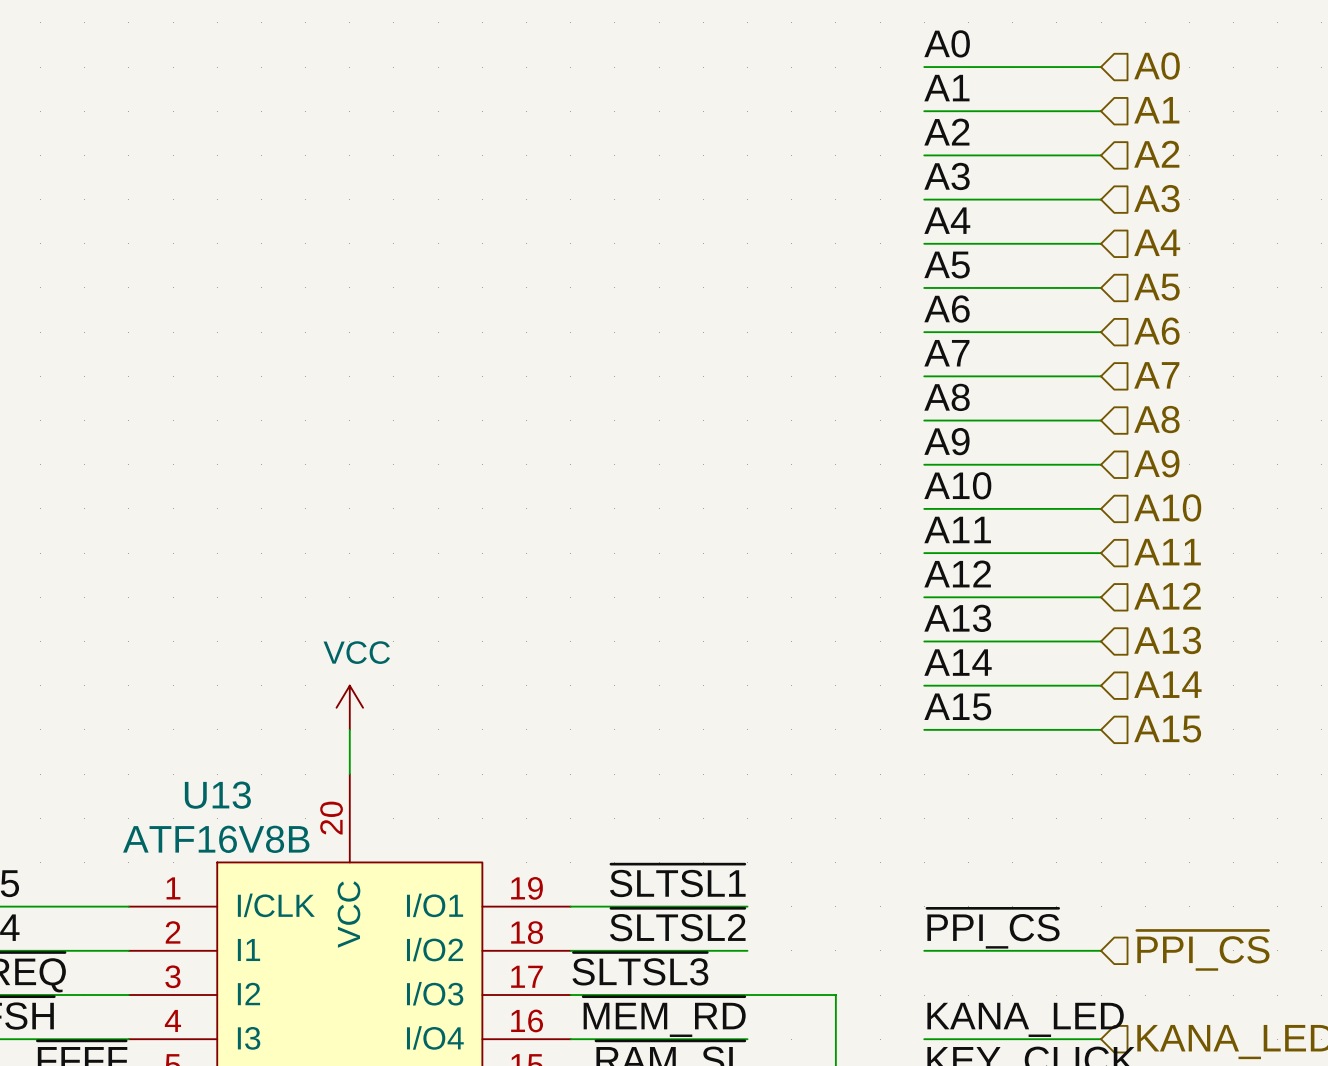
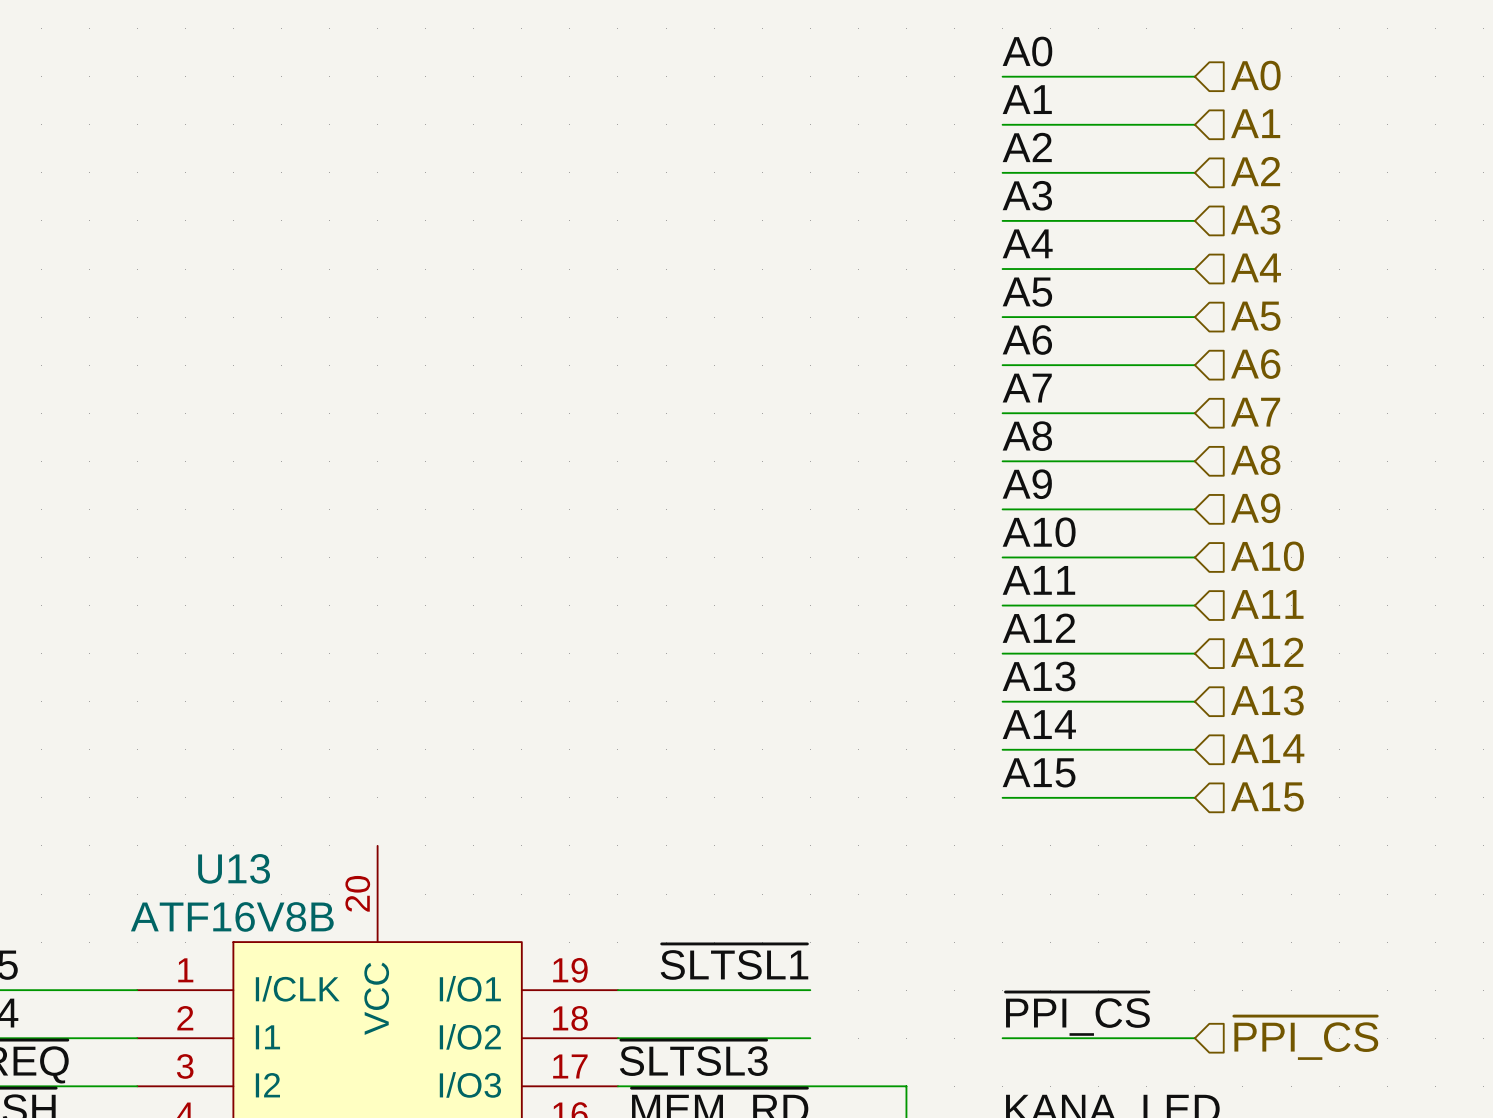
power symbol: VCC (349, 707) -> none
wire: (349, 729) (349, 774) -> none
label: ~{SLTSL2} (677, 924) -> none

